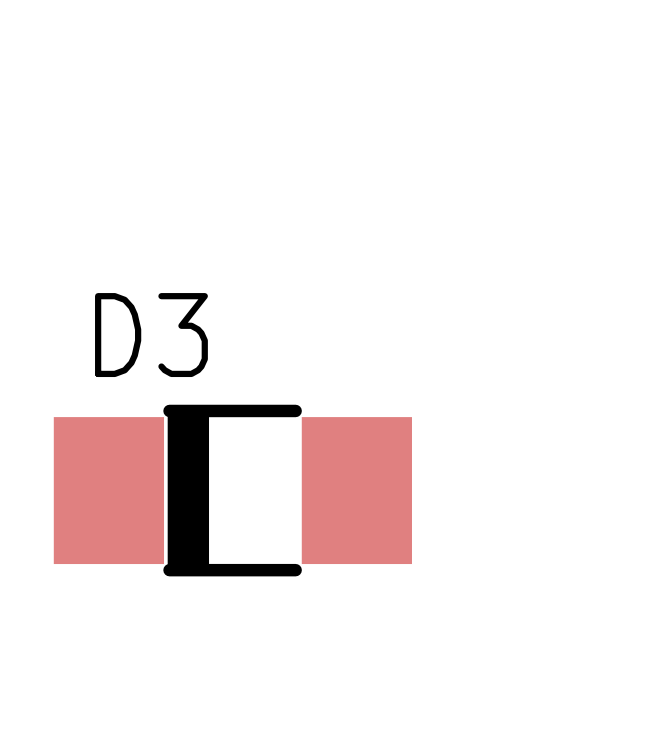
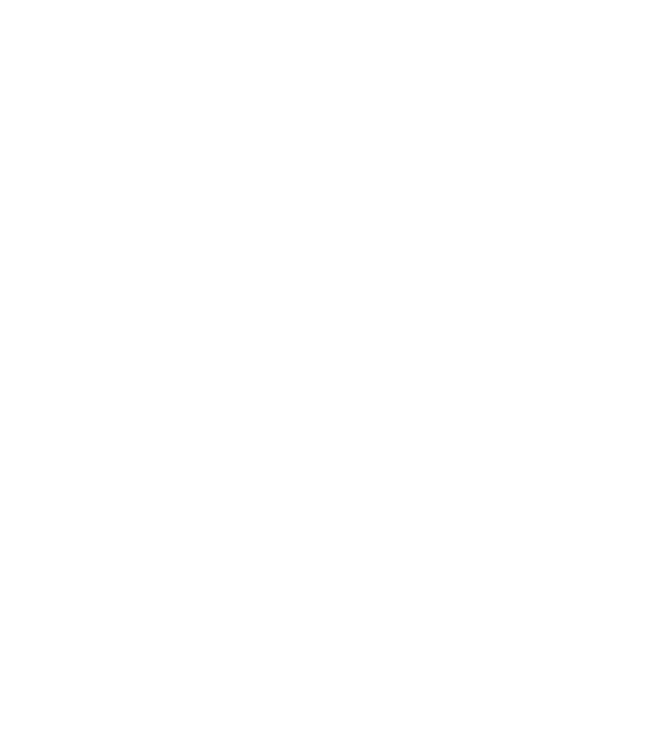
D3: (232, 490) -> none

